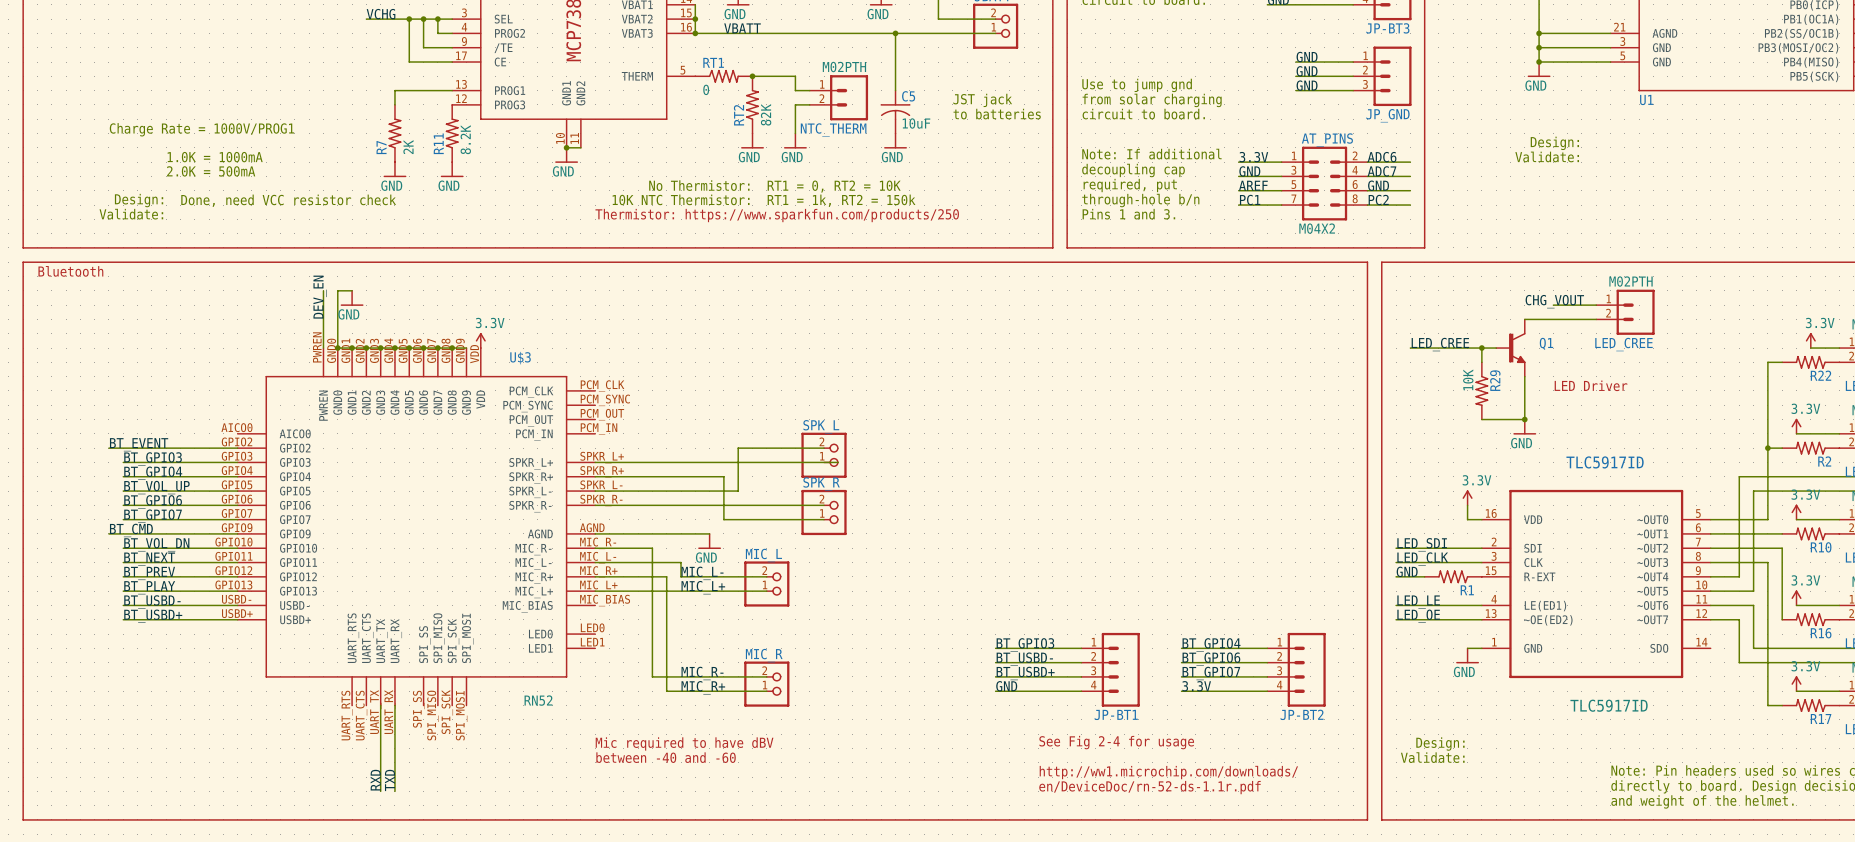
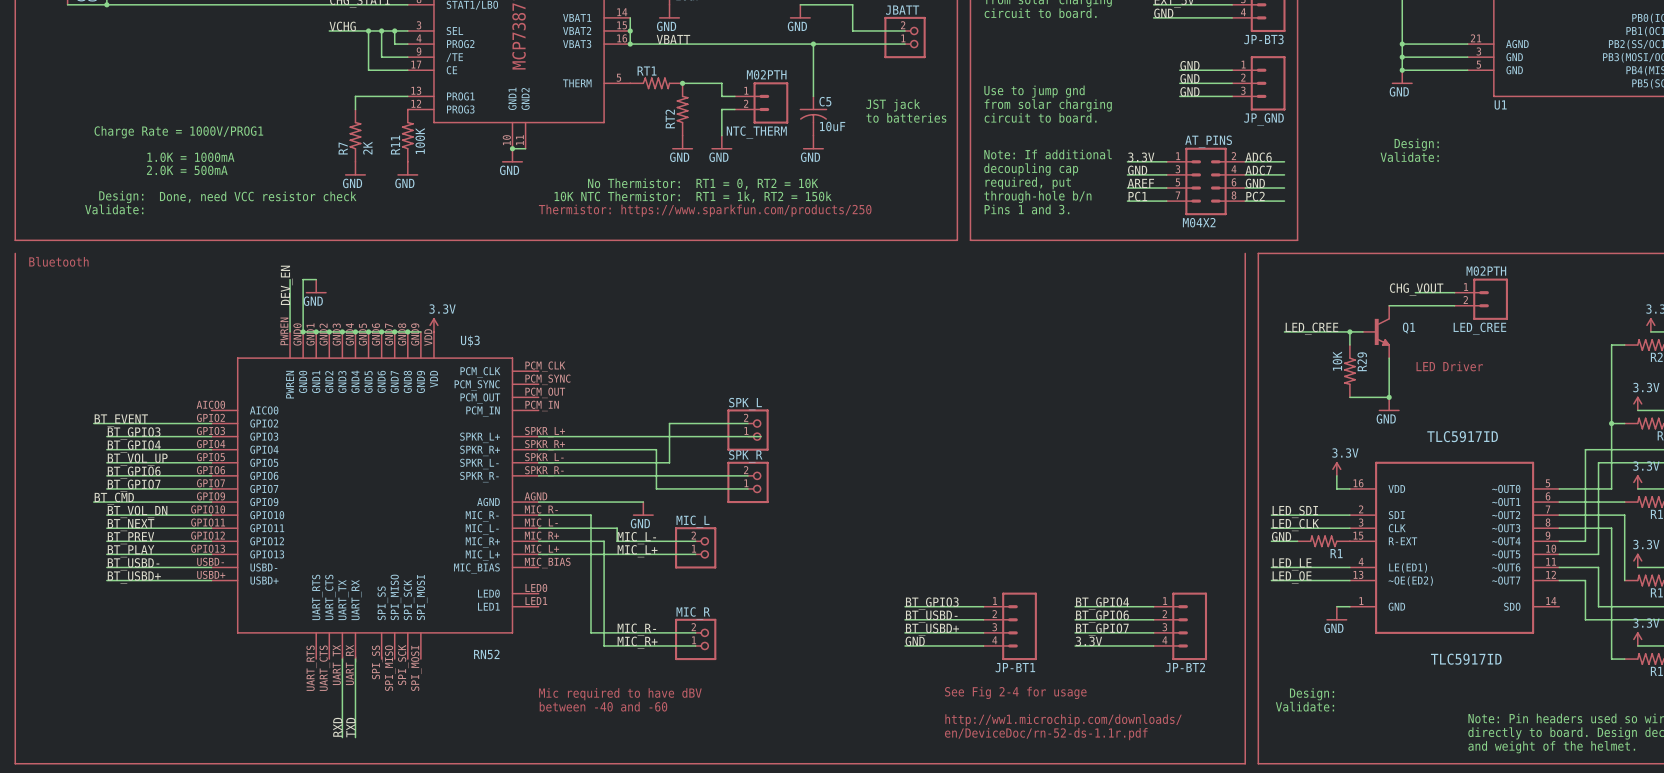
RT1 value: 0 (706, 89) -> none
RT2 value: 82K (766, 114) -> none
R11 value: 8.2K (465, 139) -> 100K (420, 141)
line: (23, 262) (1367, 262) -> none

